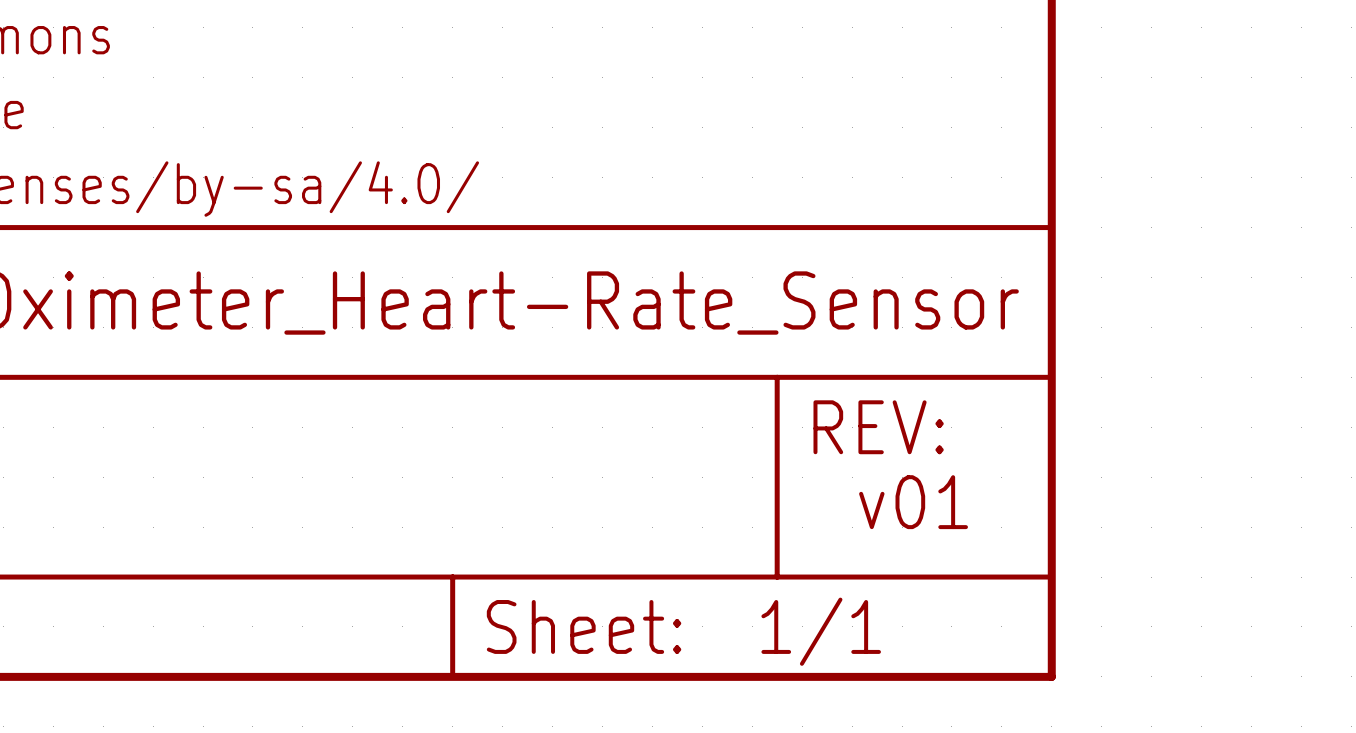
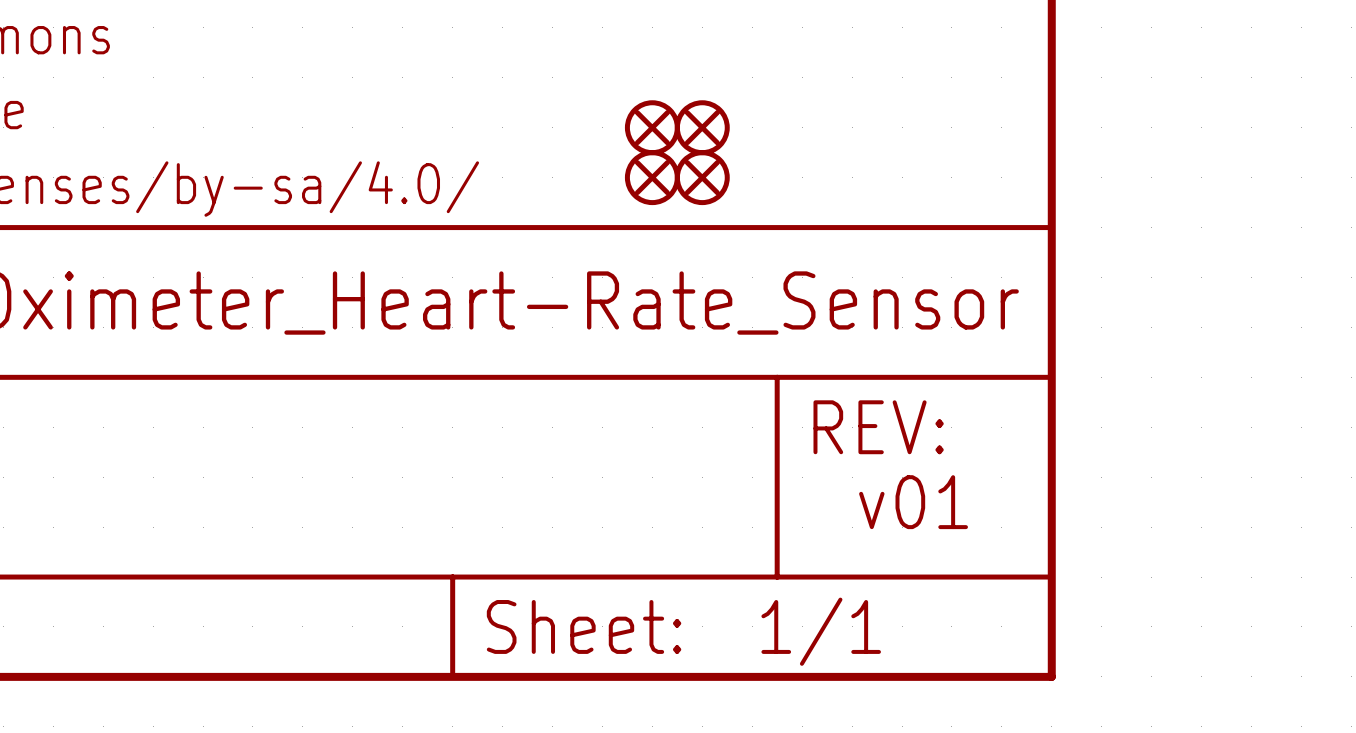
part: none -> (652, 127)
part: none -> (702, 127)
part: none -> (652, 177)
part: none -> (702, 177)

